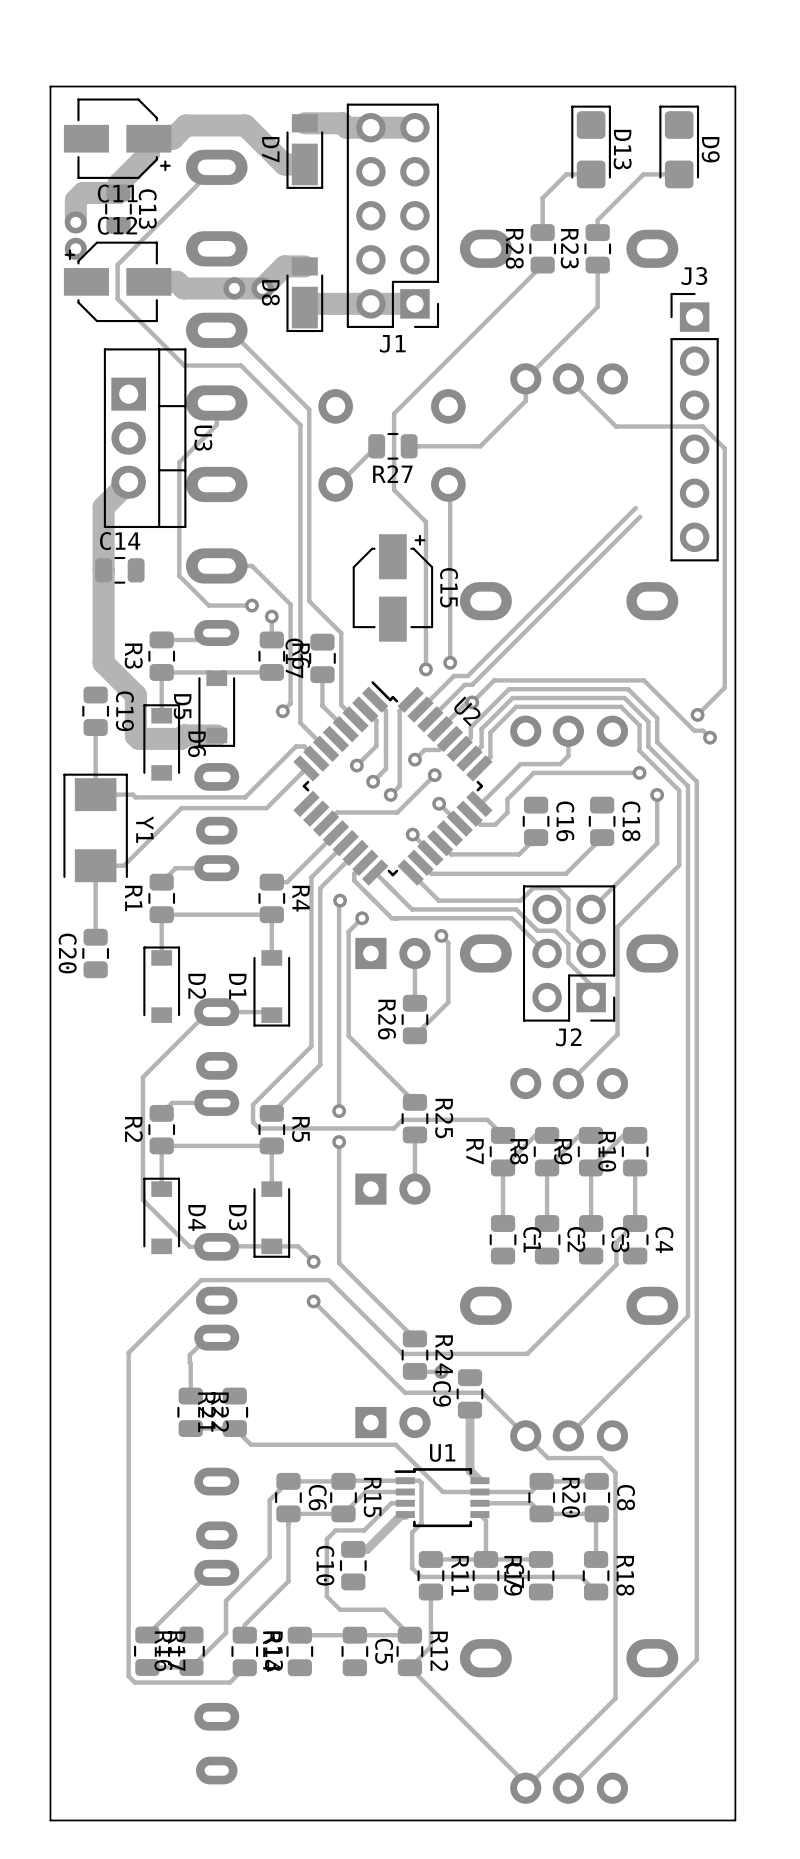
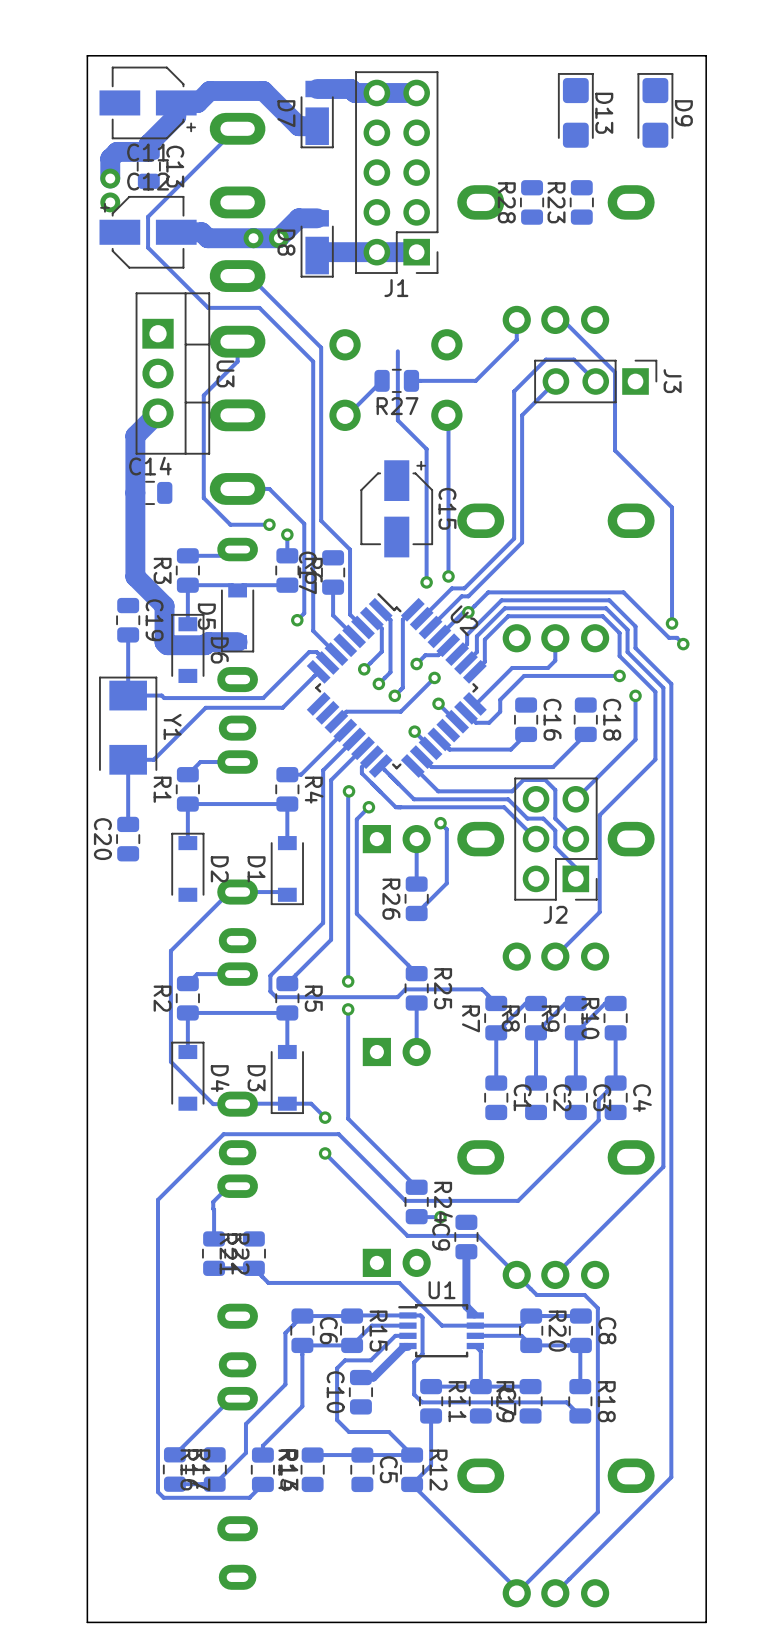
track: (591, 174) (566, 174) (542, 198) (542, 232) -> none
track: (679, 174) (643, 174) (597, 220) (597, 232) -> none
track: (542, 265) (394, 413) -> none
track: (597, 265) (597, 306) (525, 378) -> none
J3 name position: J3 (694, 276) -> J3 (672, 381)
J3 footprint: [670, 292, 719, 562] -> [534, 359, 658, 404]
track: (568, 378) (616, 426) (702, 426) (724, 448) (724, 687) (697, 714) -> (555, 319) (562, 319) (615, 372) (615, 450) (672, 507) (672, 623)
track: (635, 507) (522, 620) -> (595, 381) (573, 359) (545, 359) (514, 391) (514, 538)
track: (640, 516) (531, 625) -> (555, 381) (522, 415) (522, 542)

